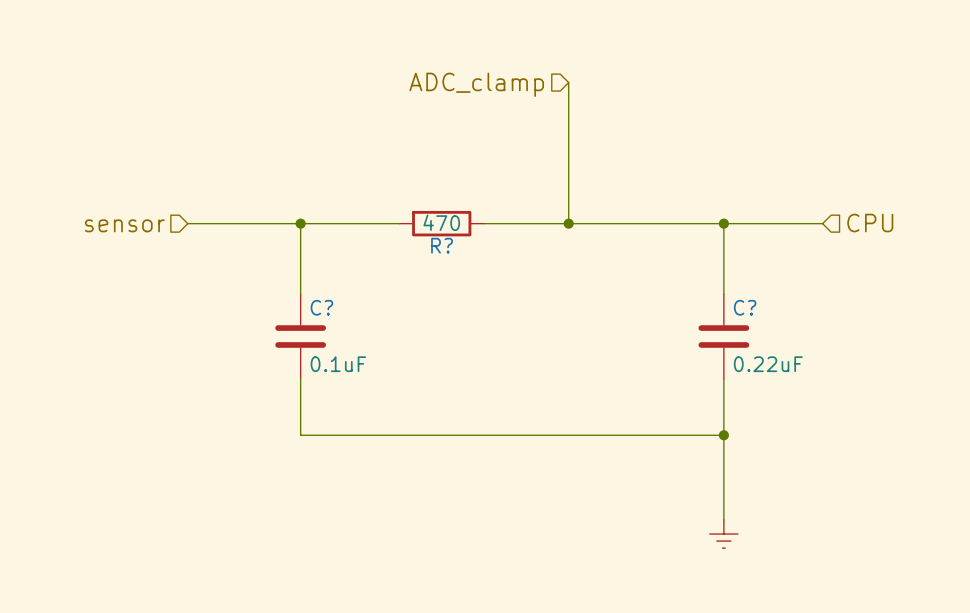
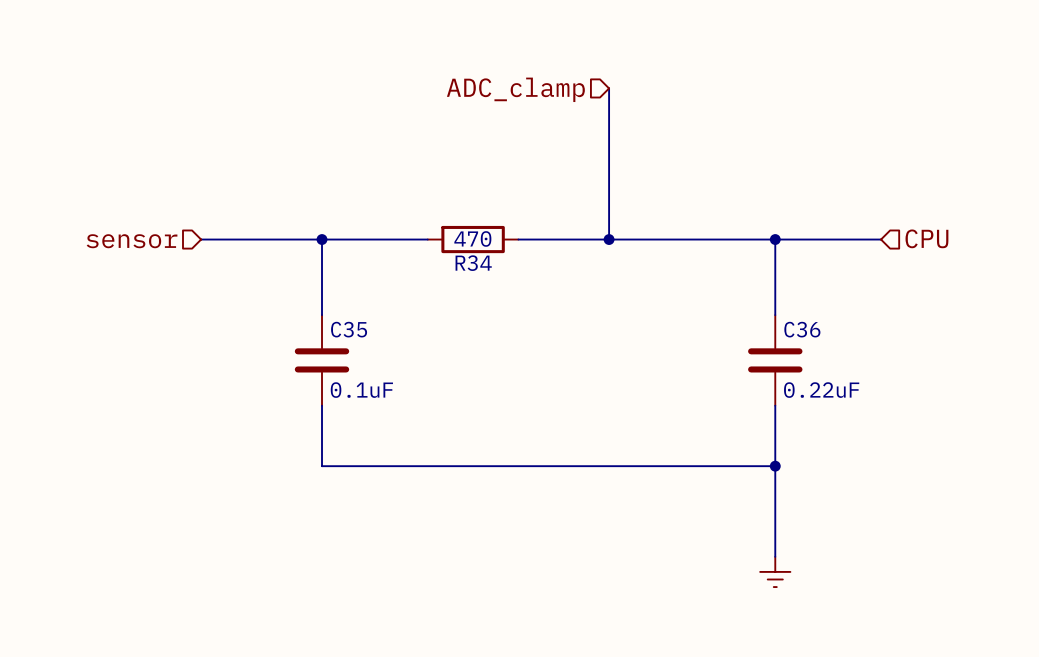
R? name: R? (442, 245) -> R34 (473, 263)
C? name: C? (321, 307) -> C35 (349, 329)
C? name: C? (745, 307) -> C36 (802, 329)

